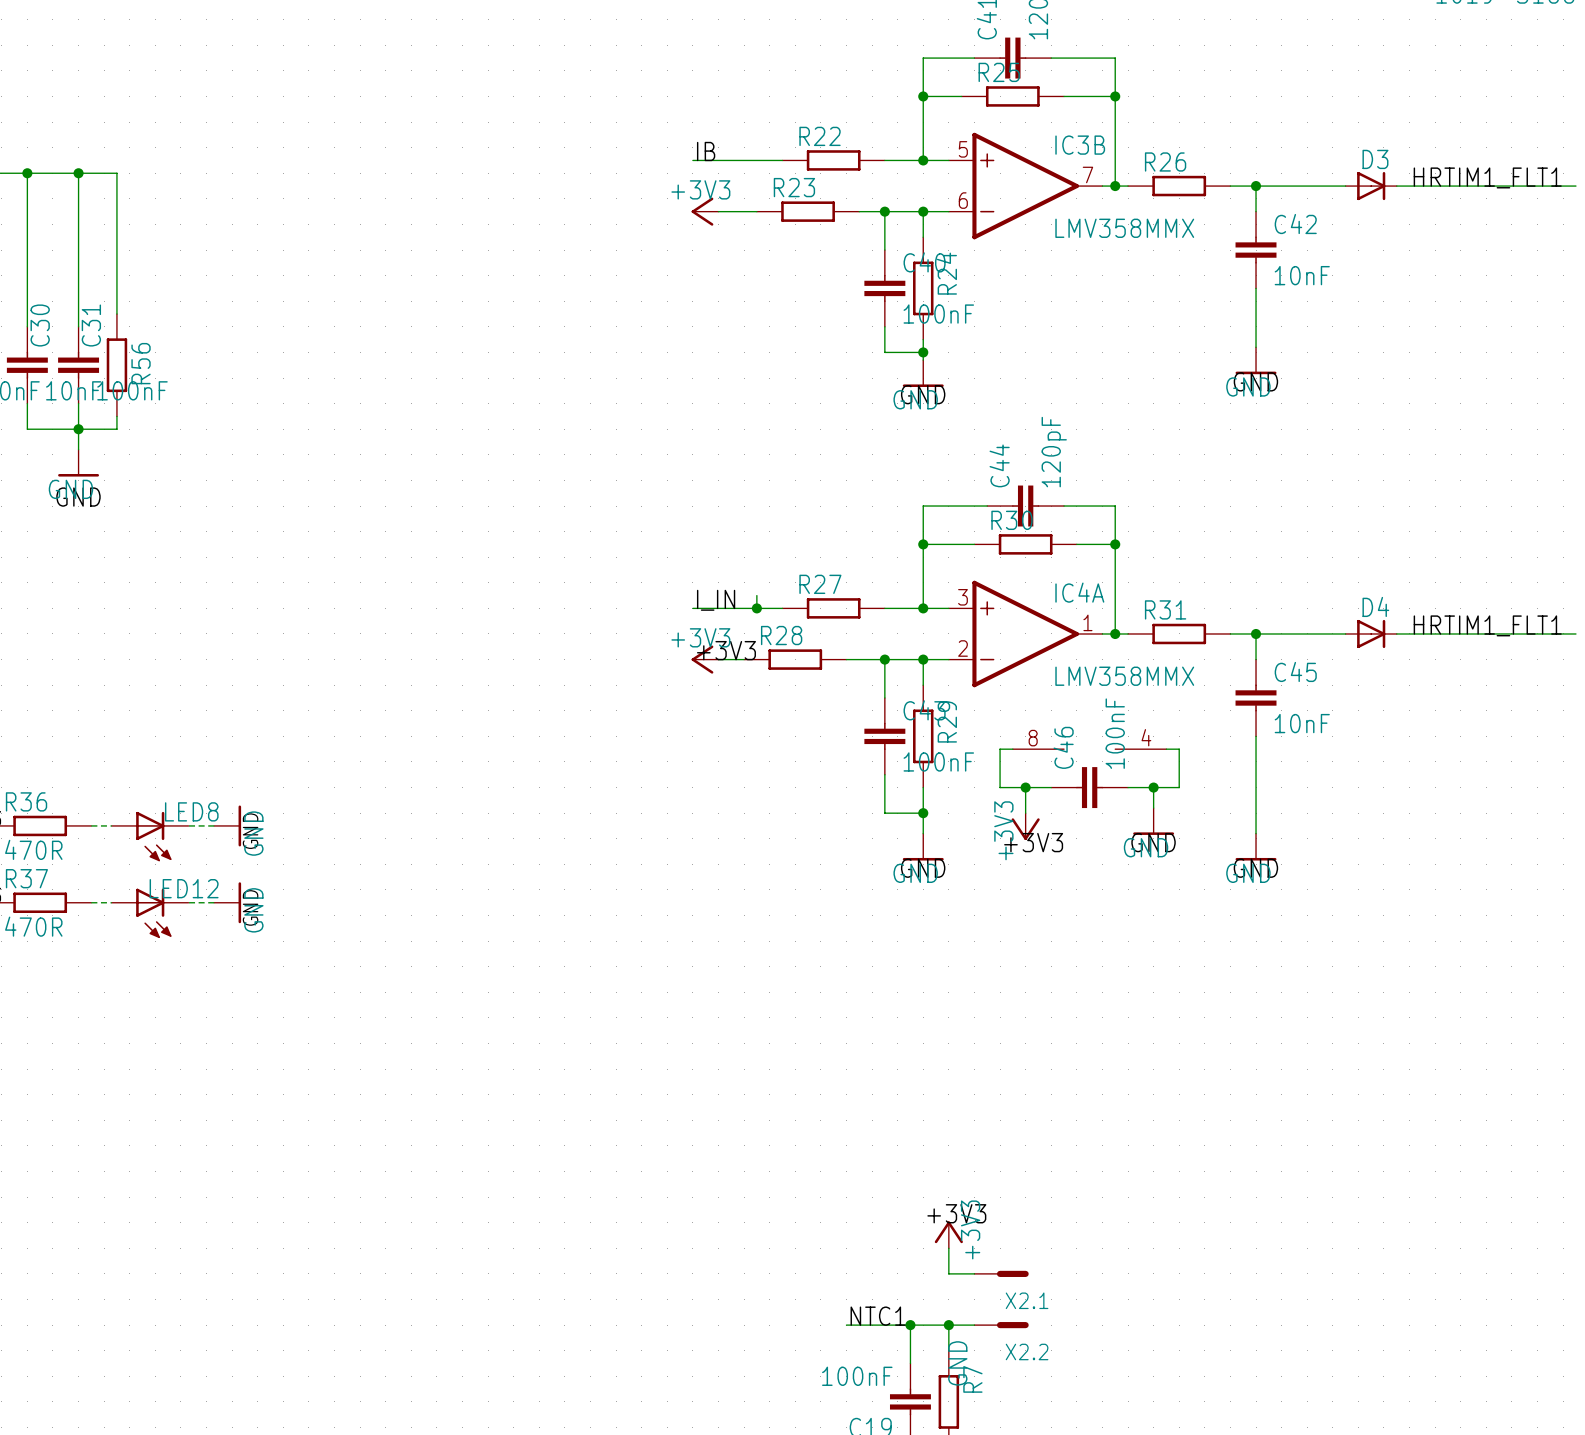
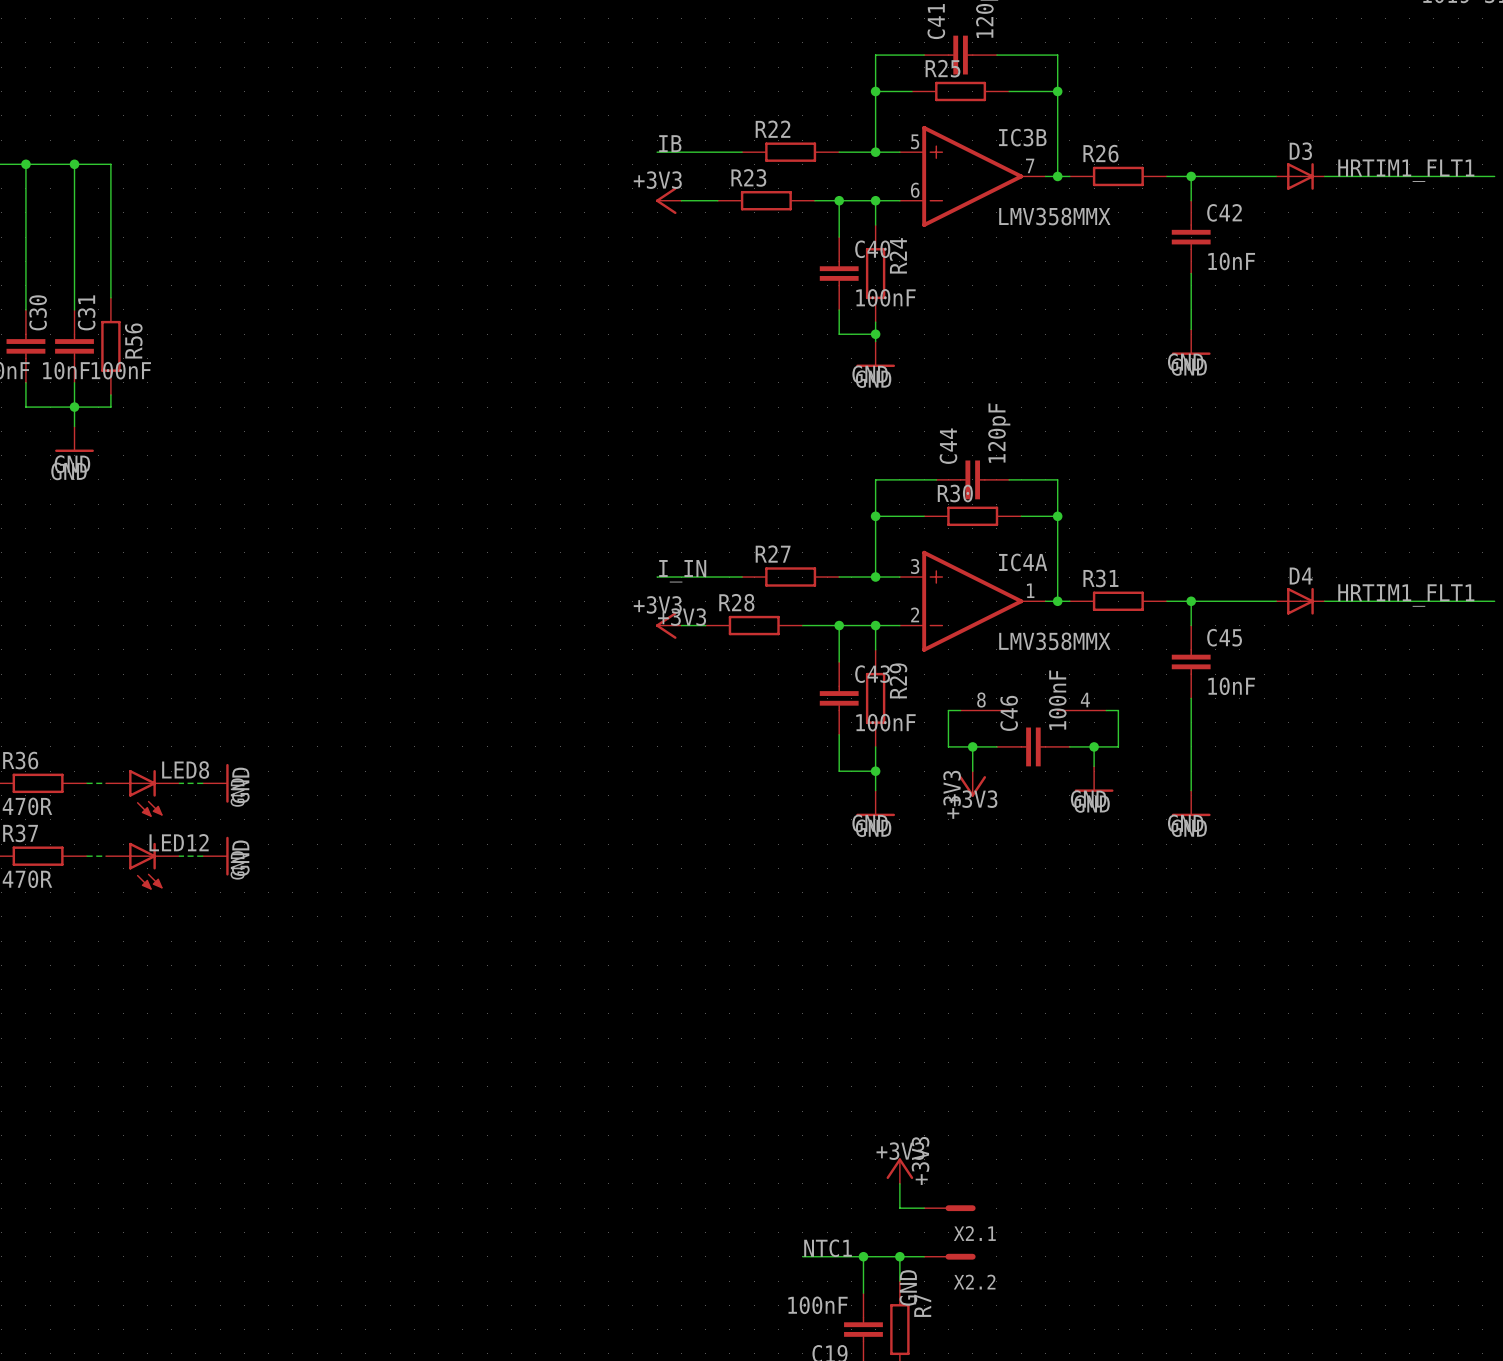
wire: (756, 595) (756, 608) -> none
junction: (756, 608) -> none

